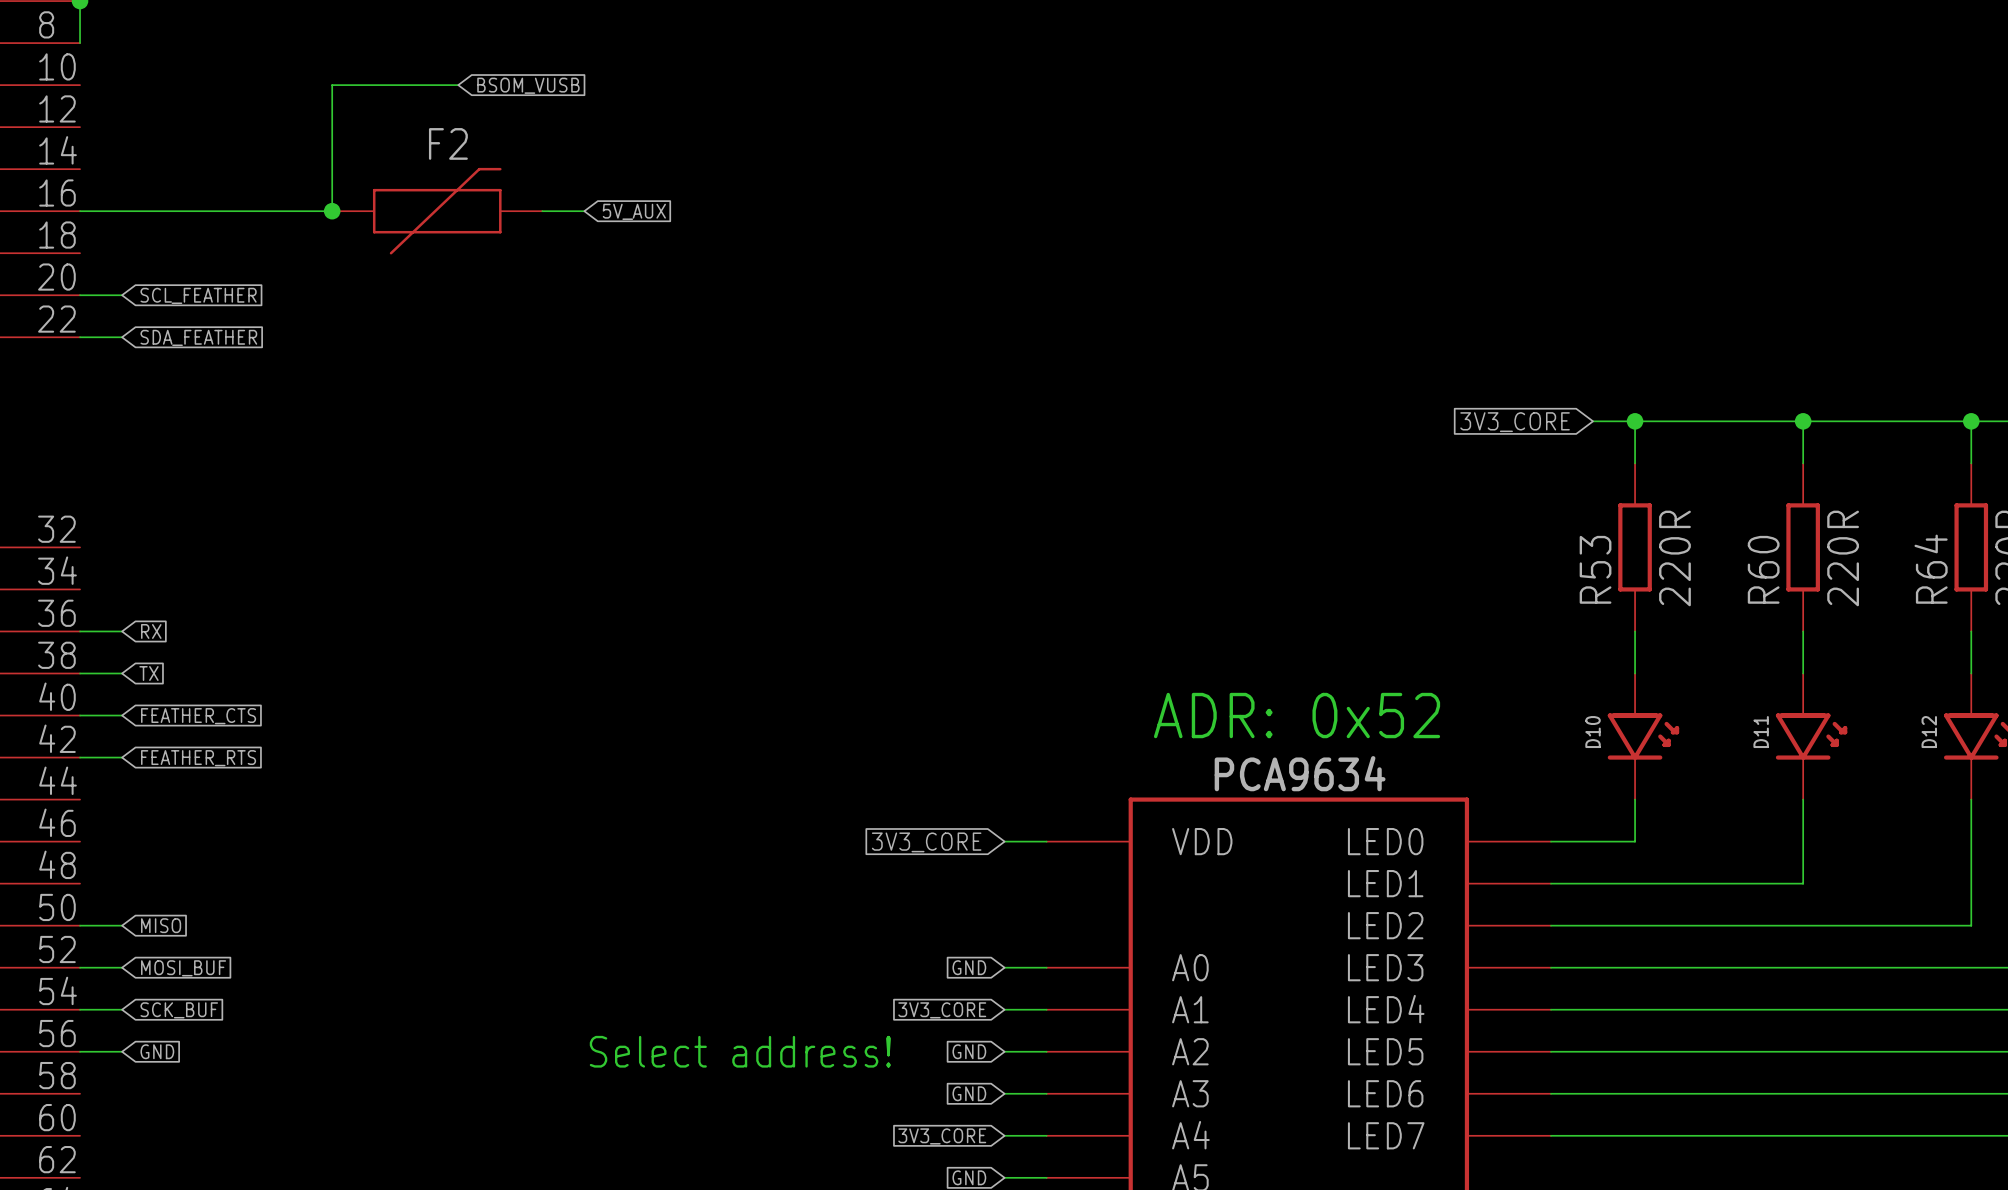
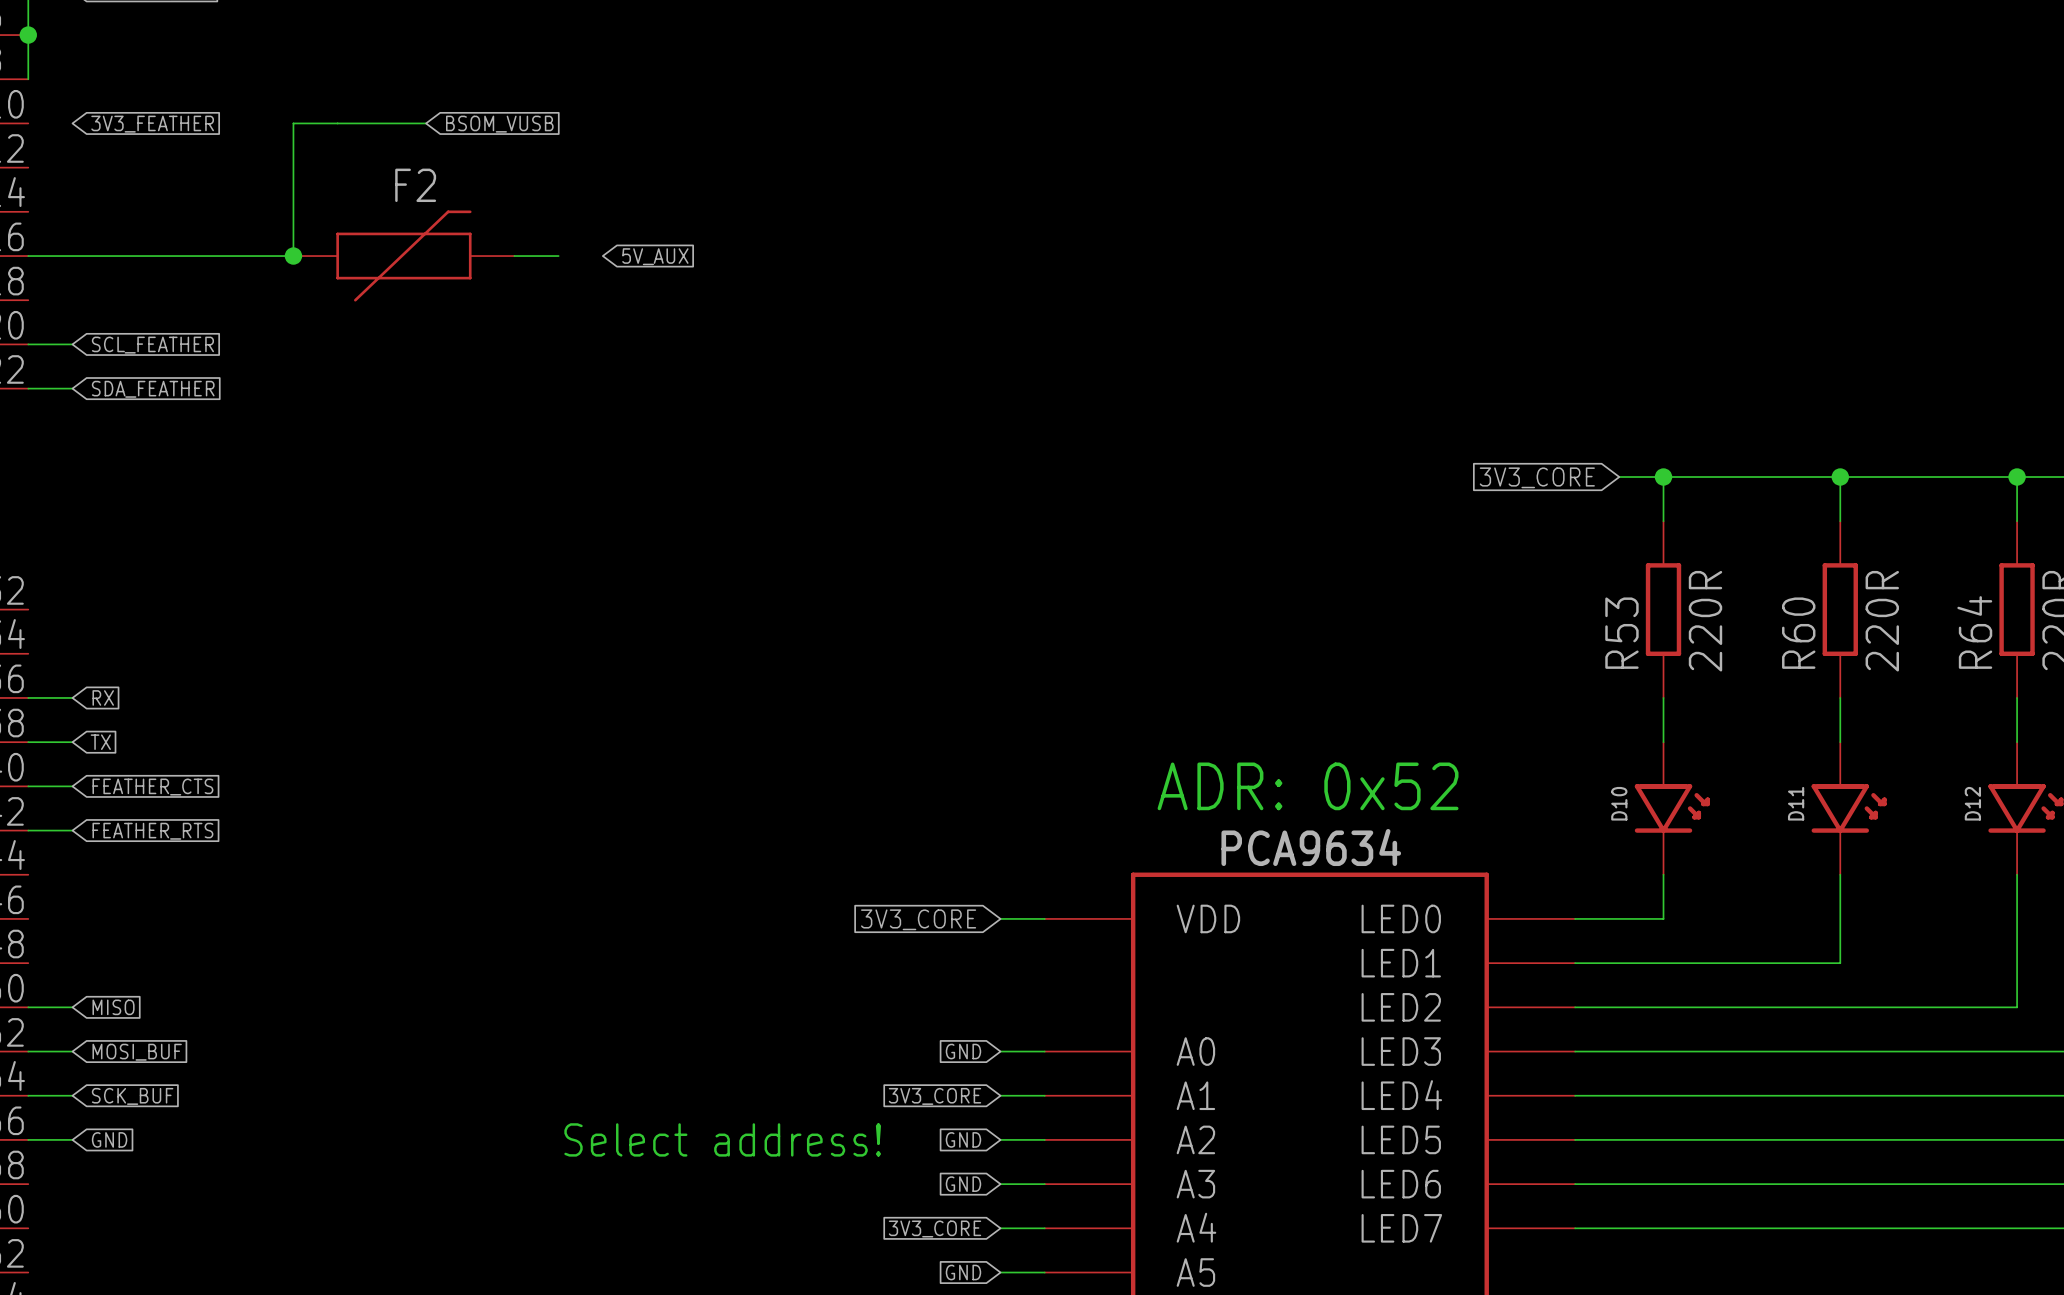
global label: none -> 3V3_FEATHER (152, 124)
global label position: 5V_AUX (634, 211) -> 5V_AUX (655, 256)

